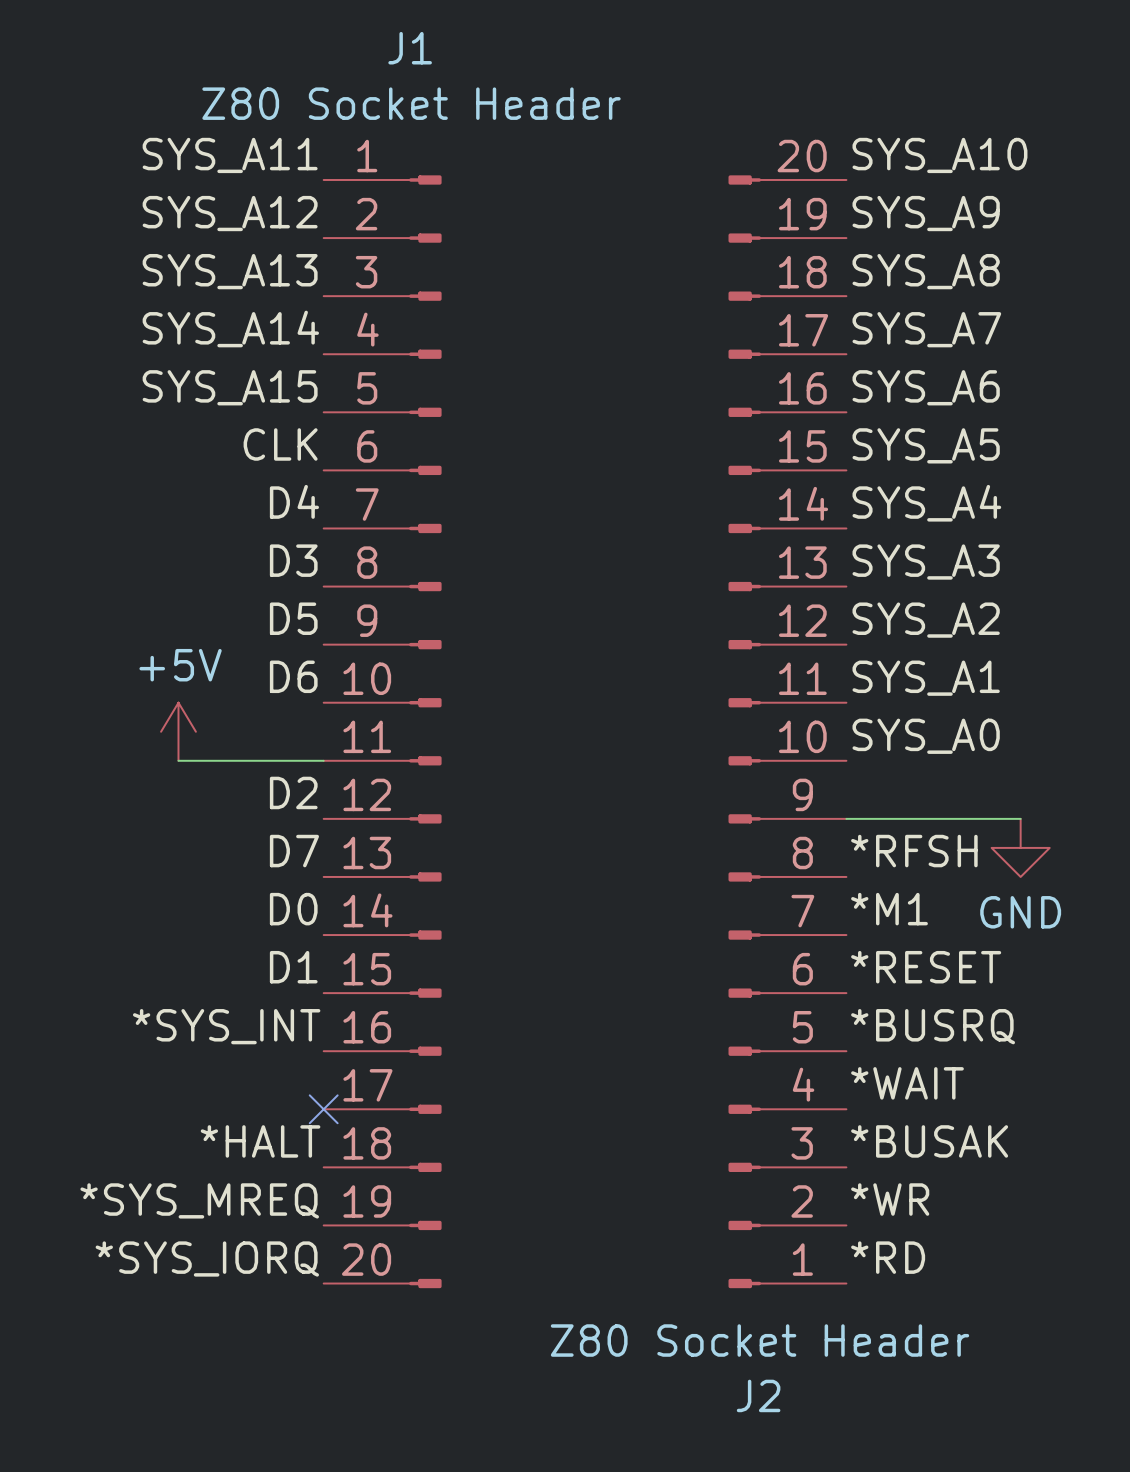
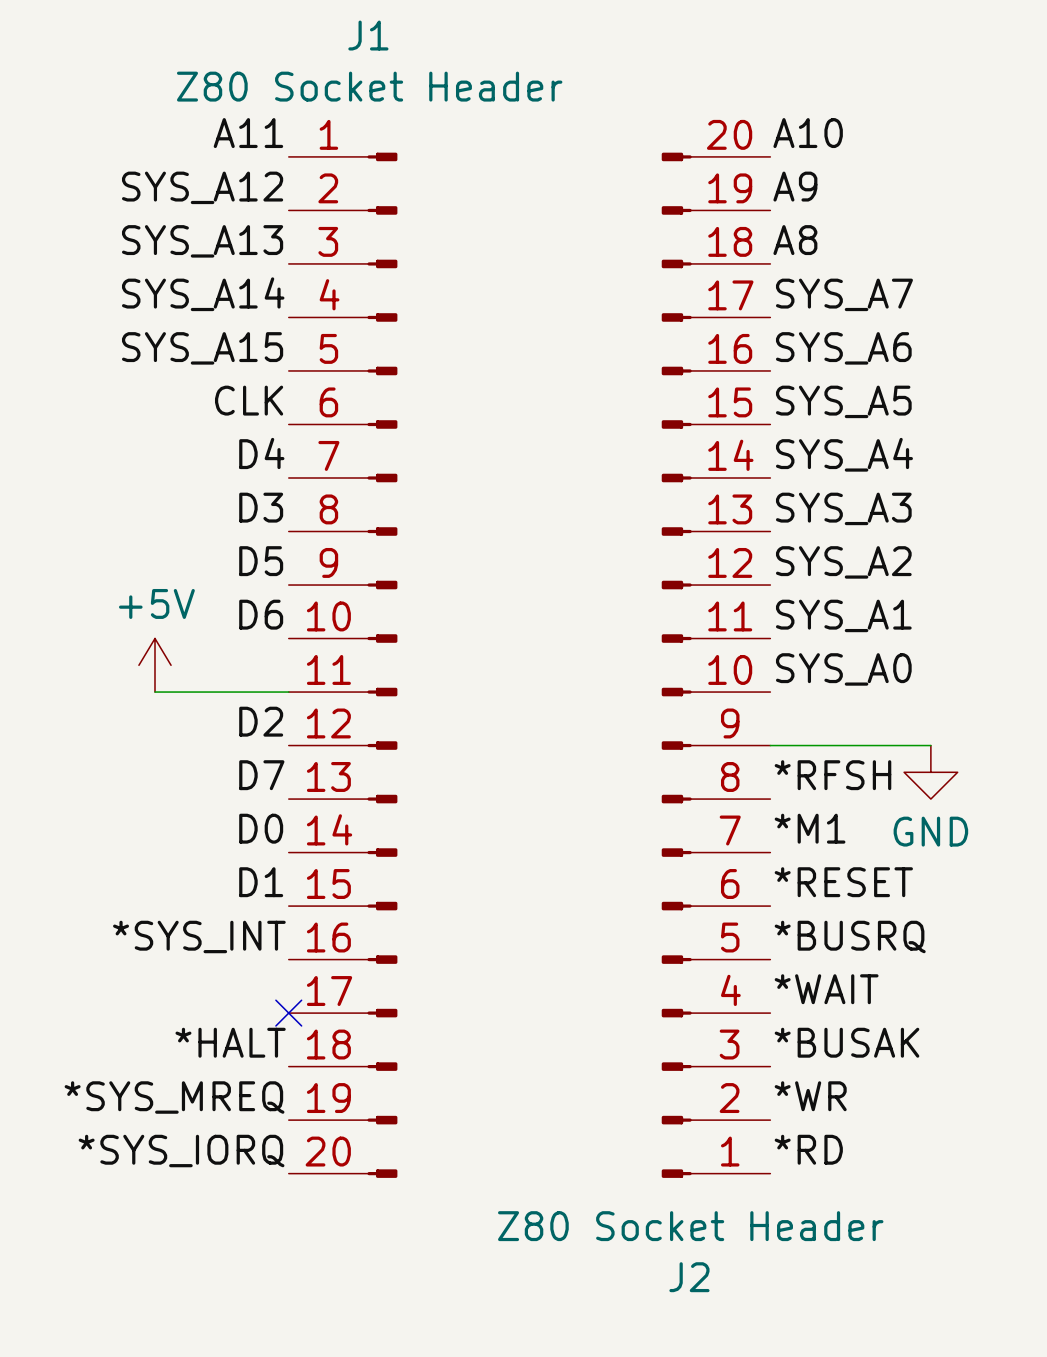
label: SYS_A11 (230, 155) -> A11 (248, 133)
label: SYS_A10 (939, 155) -> A10 (808, 133)
label: SYS_A9 (926, 213) -> A9 (795, 186)
label: SYS_A8 (926, 271) -> A8 (795, 240)

